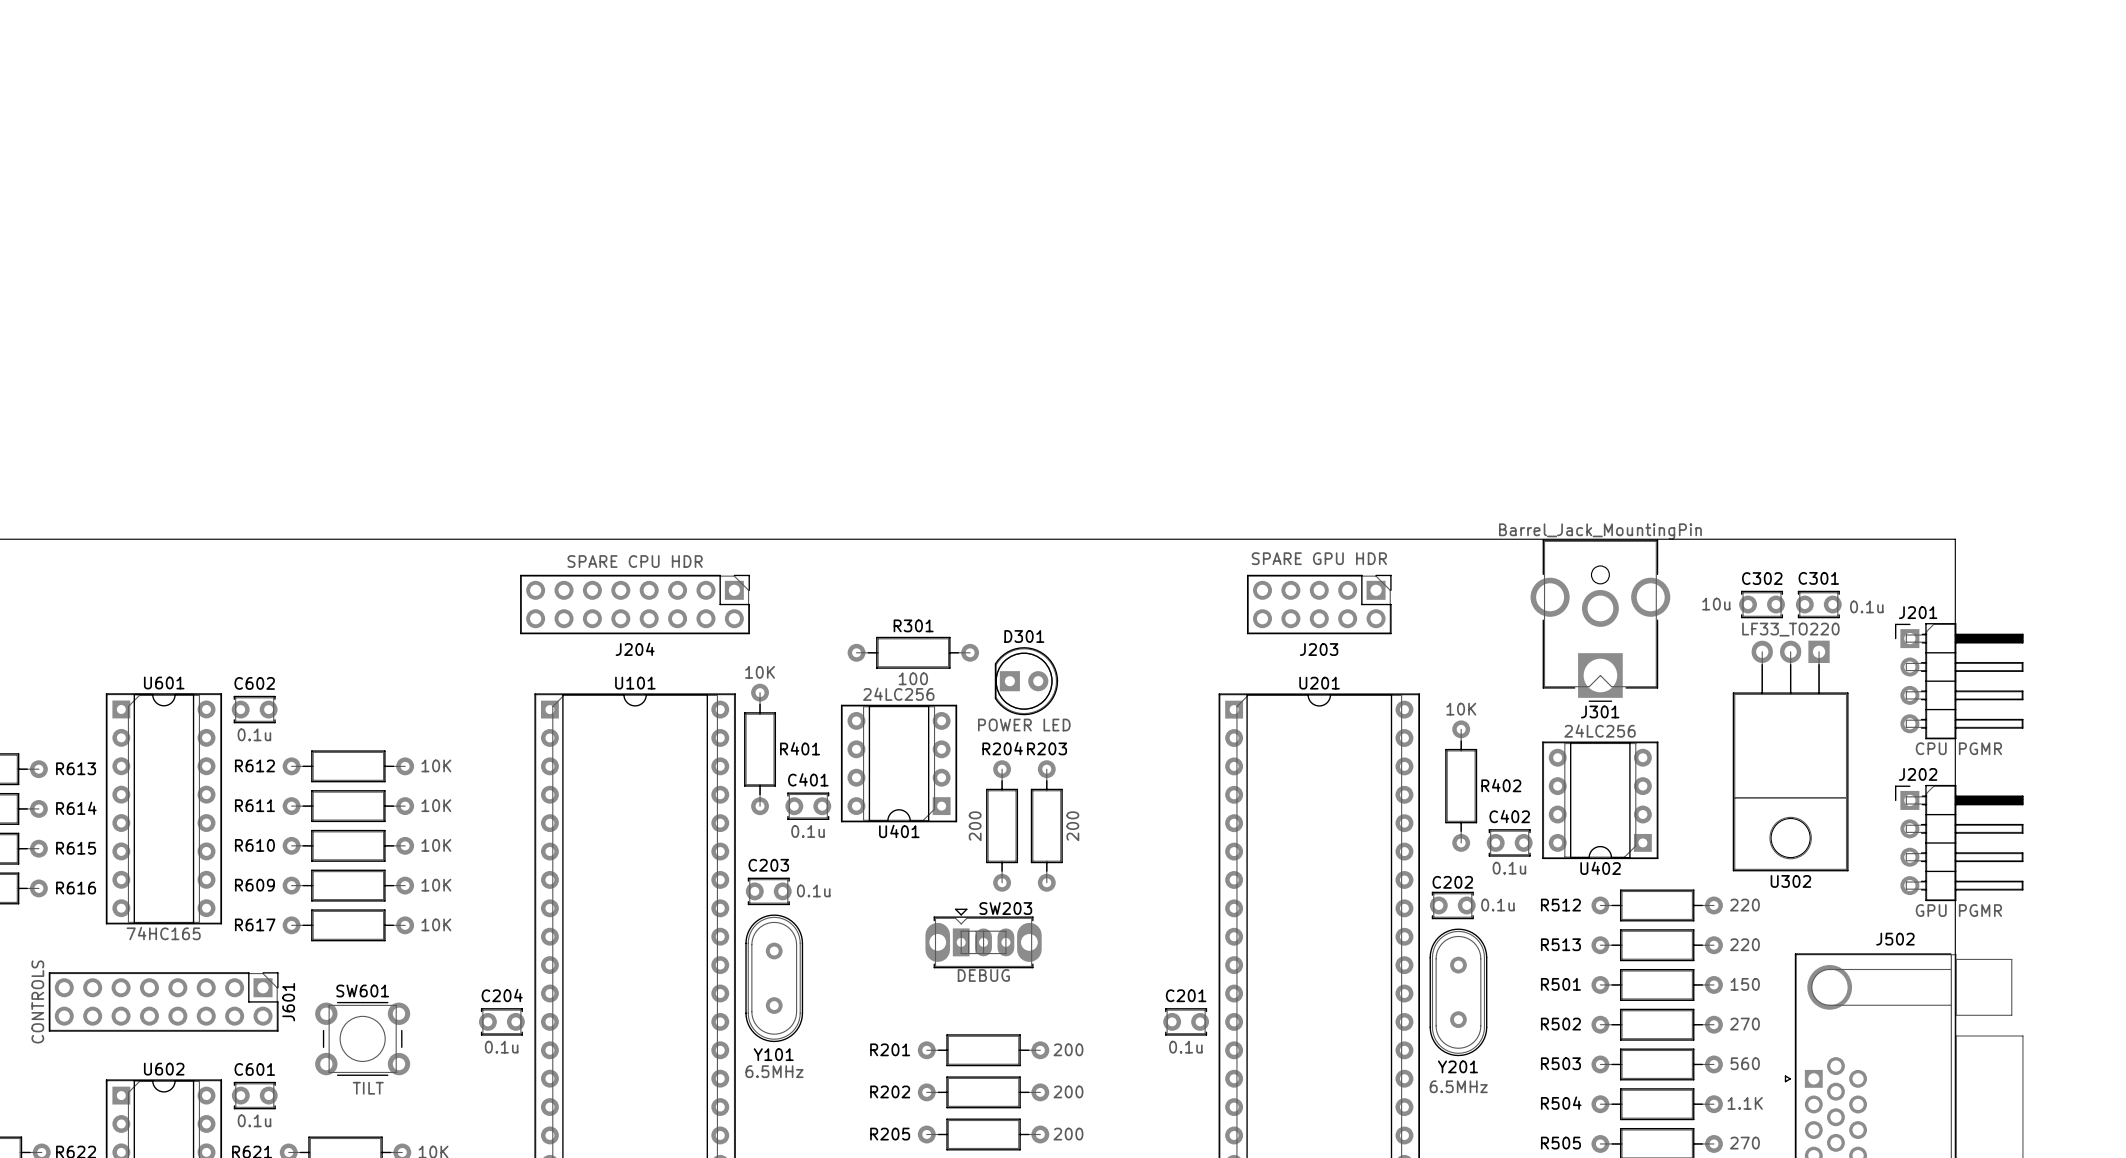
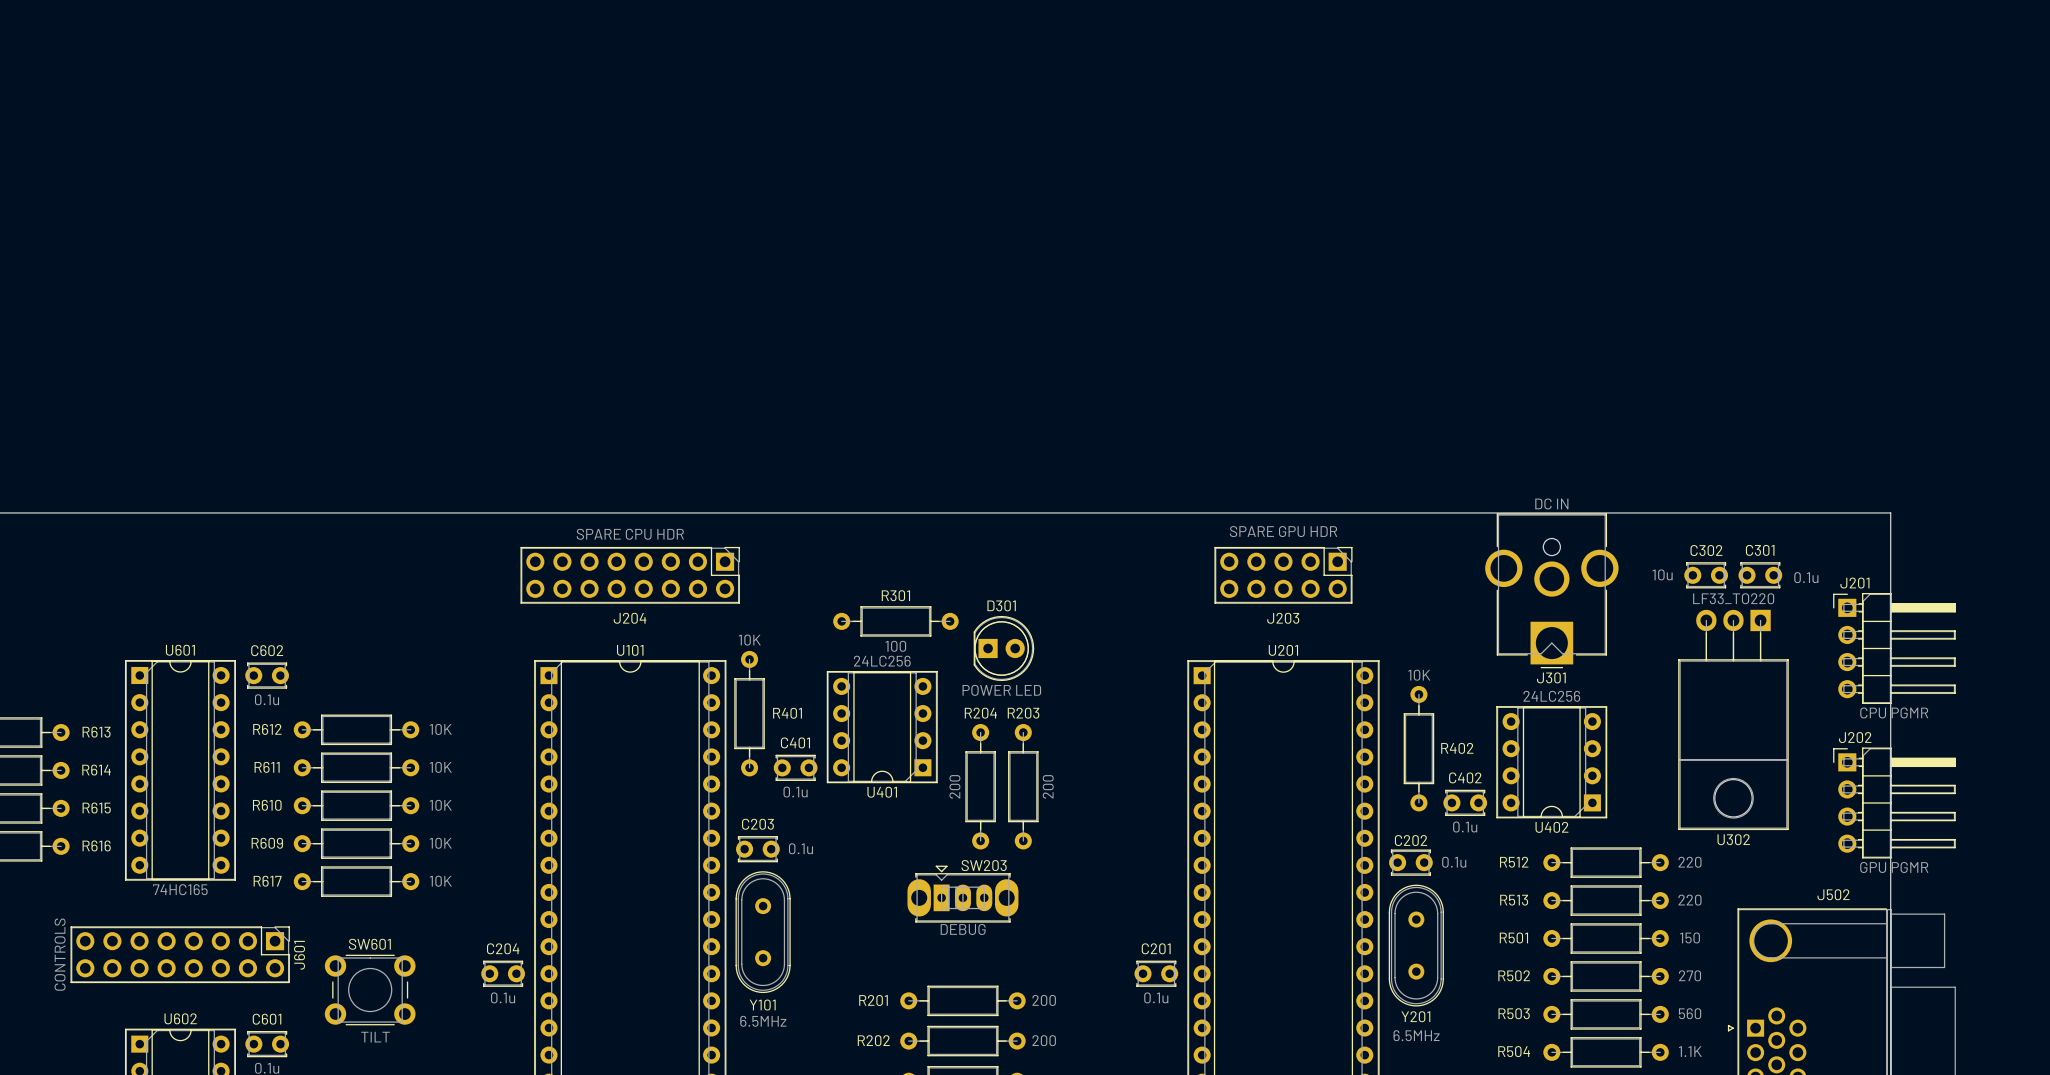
J301 value: Barrel_Jack_MountingPin (1600, 531) -> DC IN (1551, 503)

